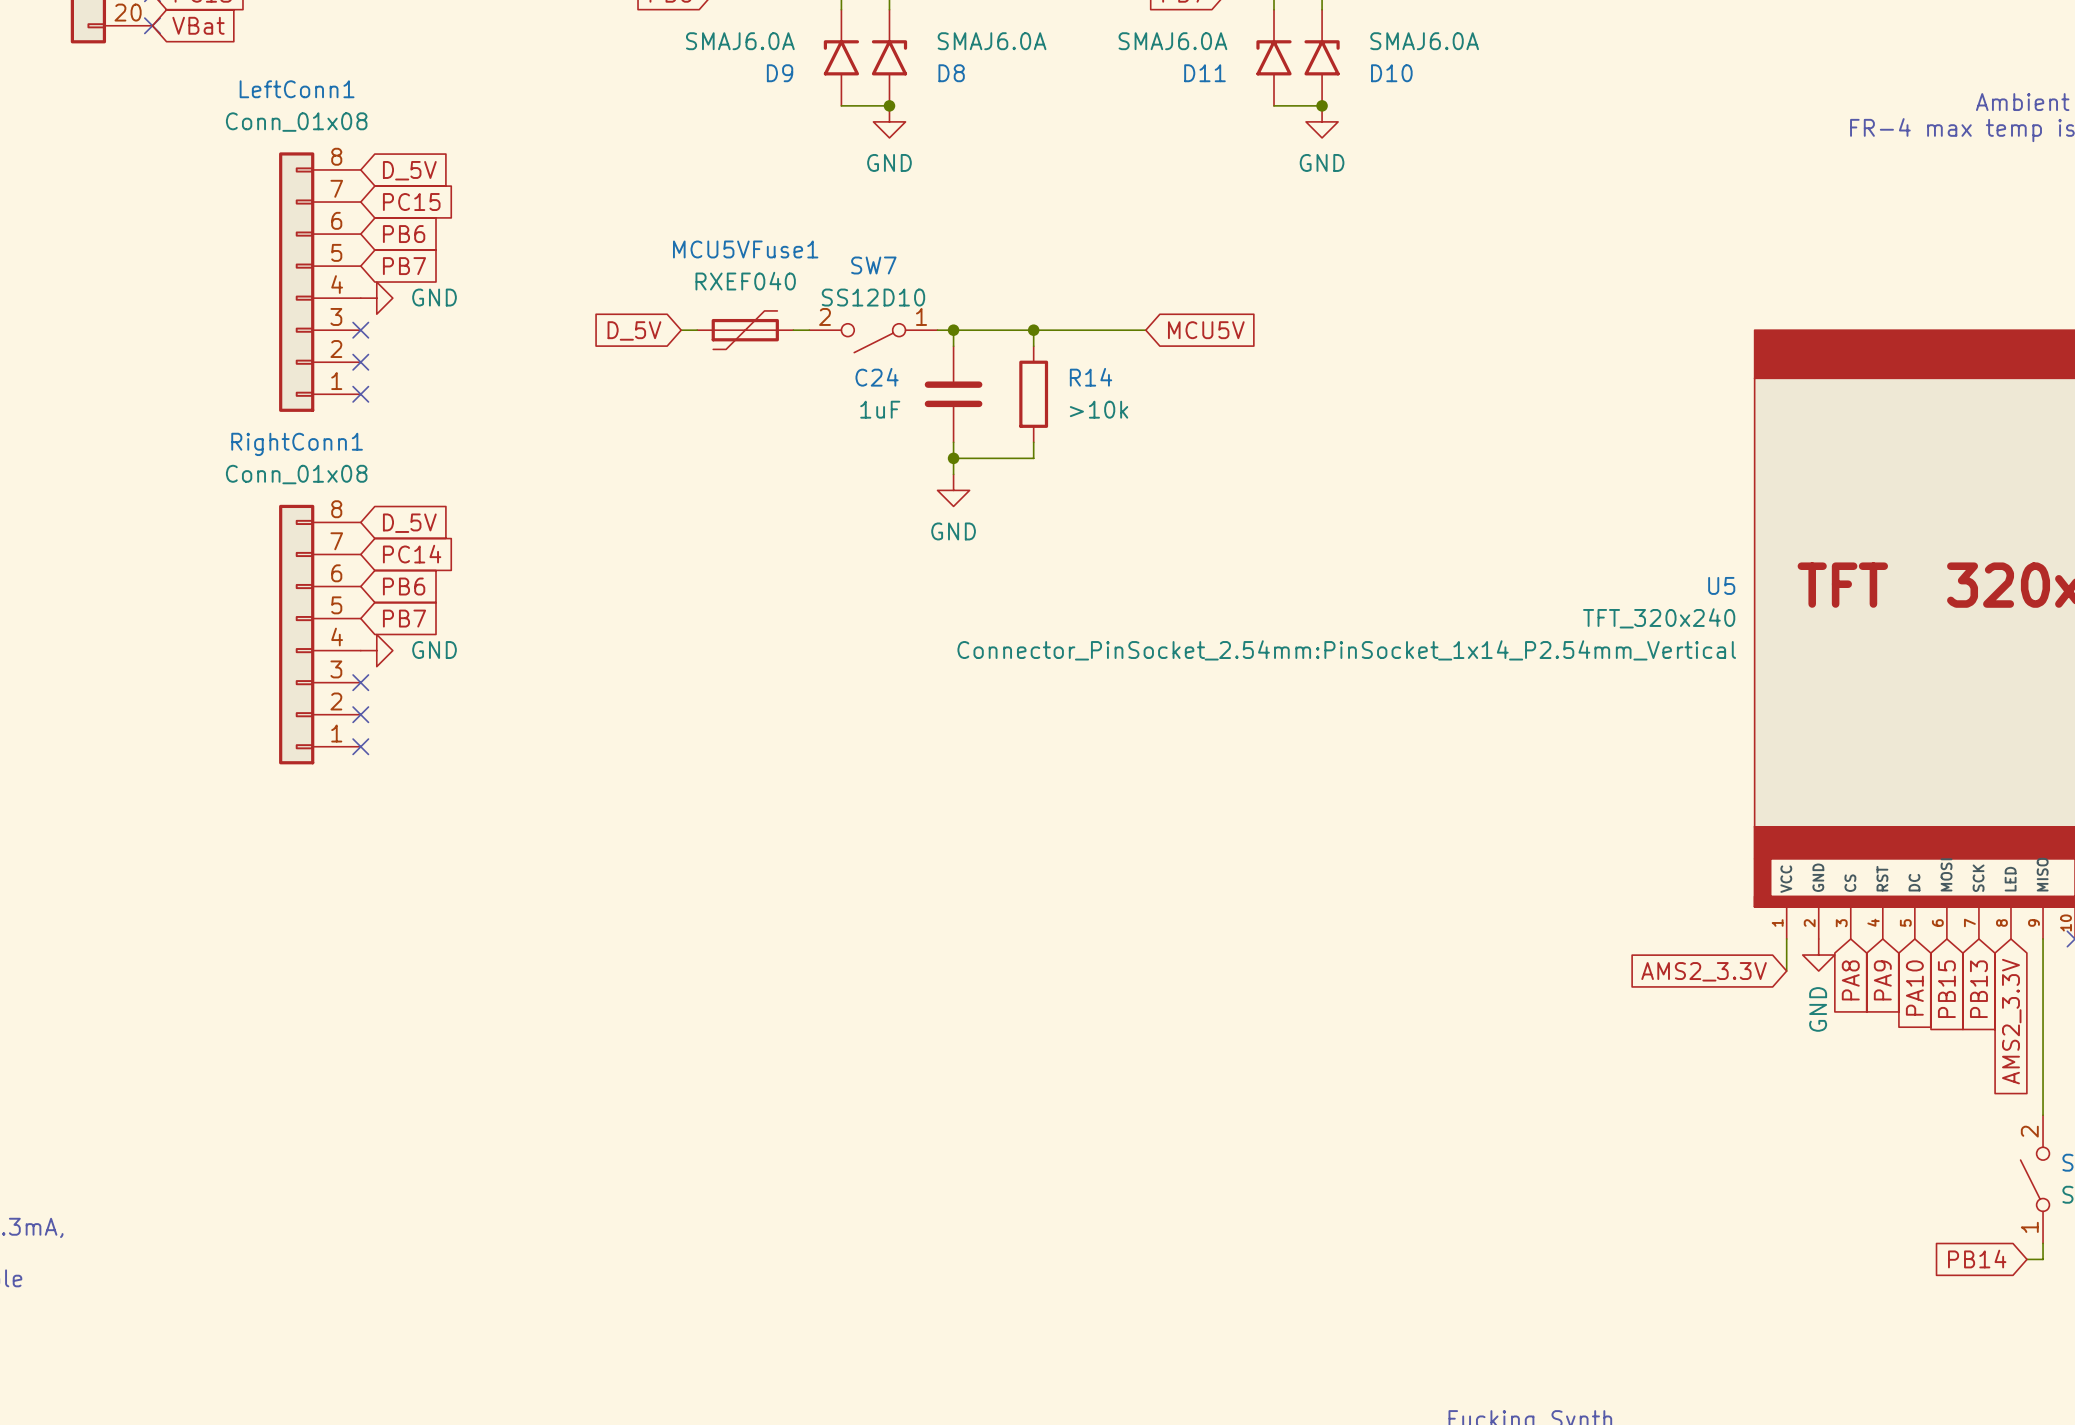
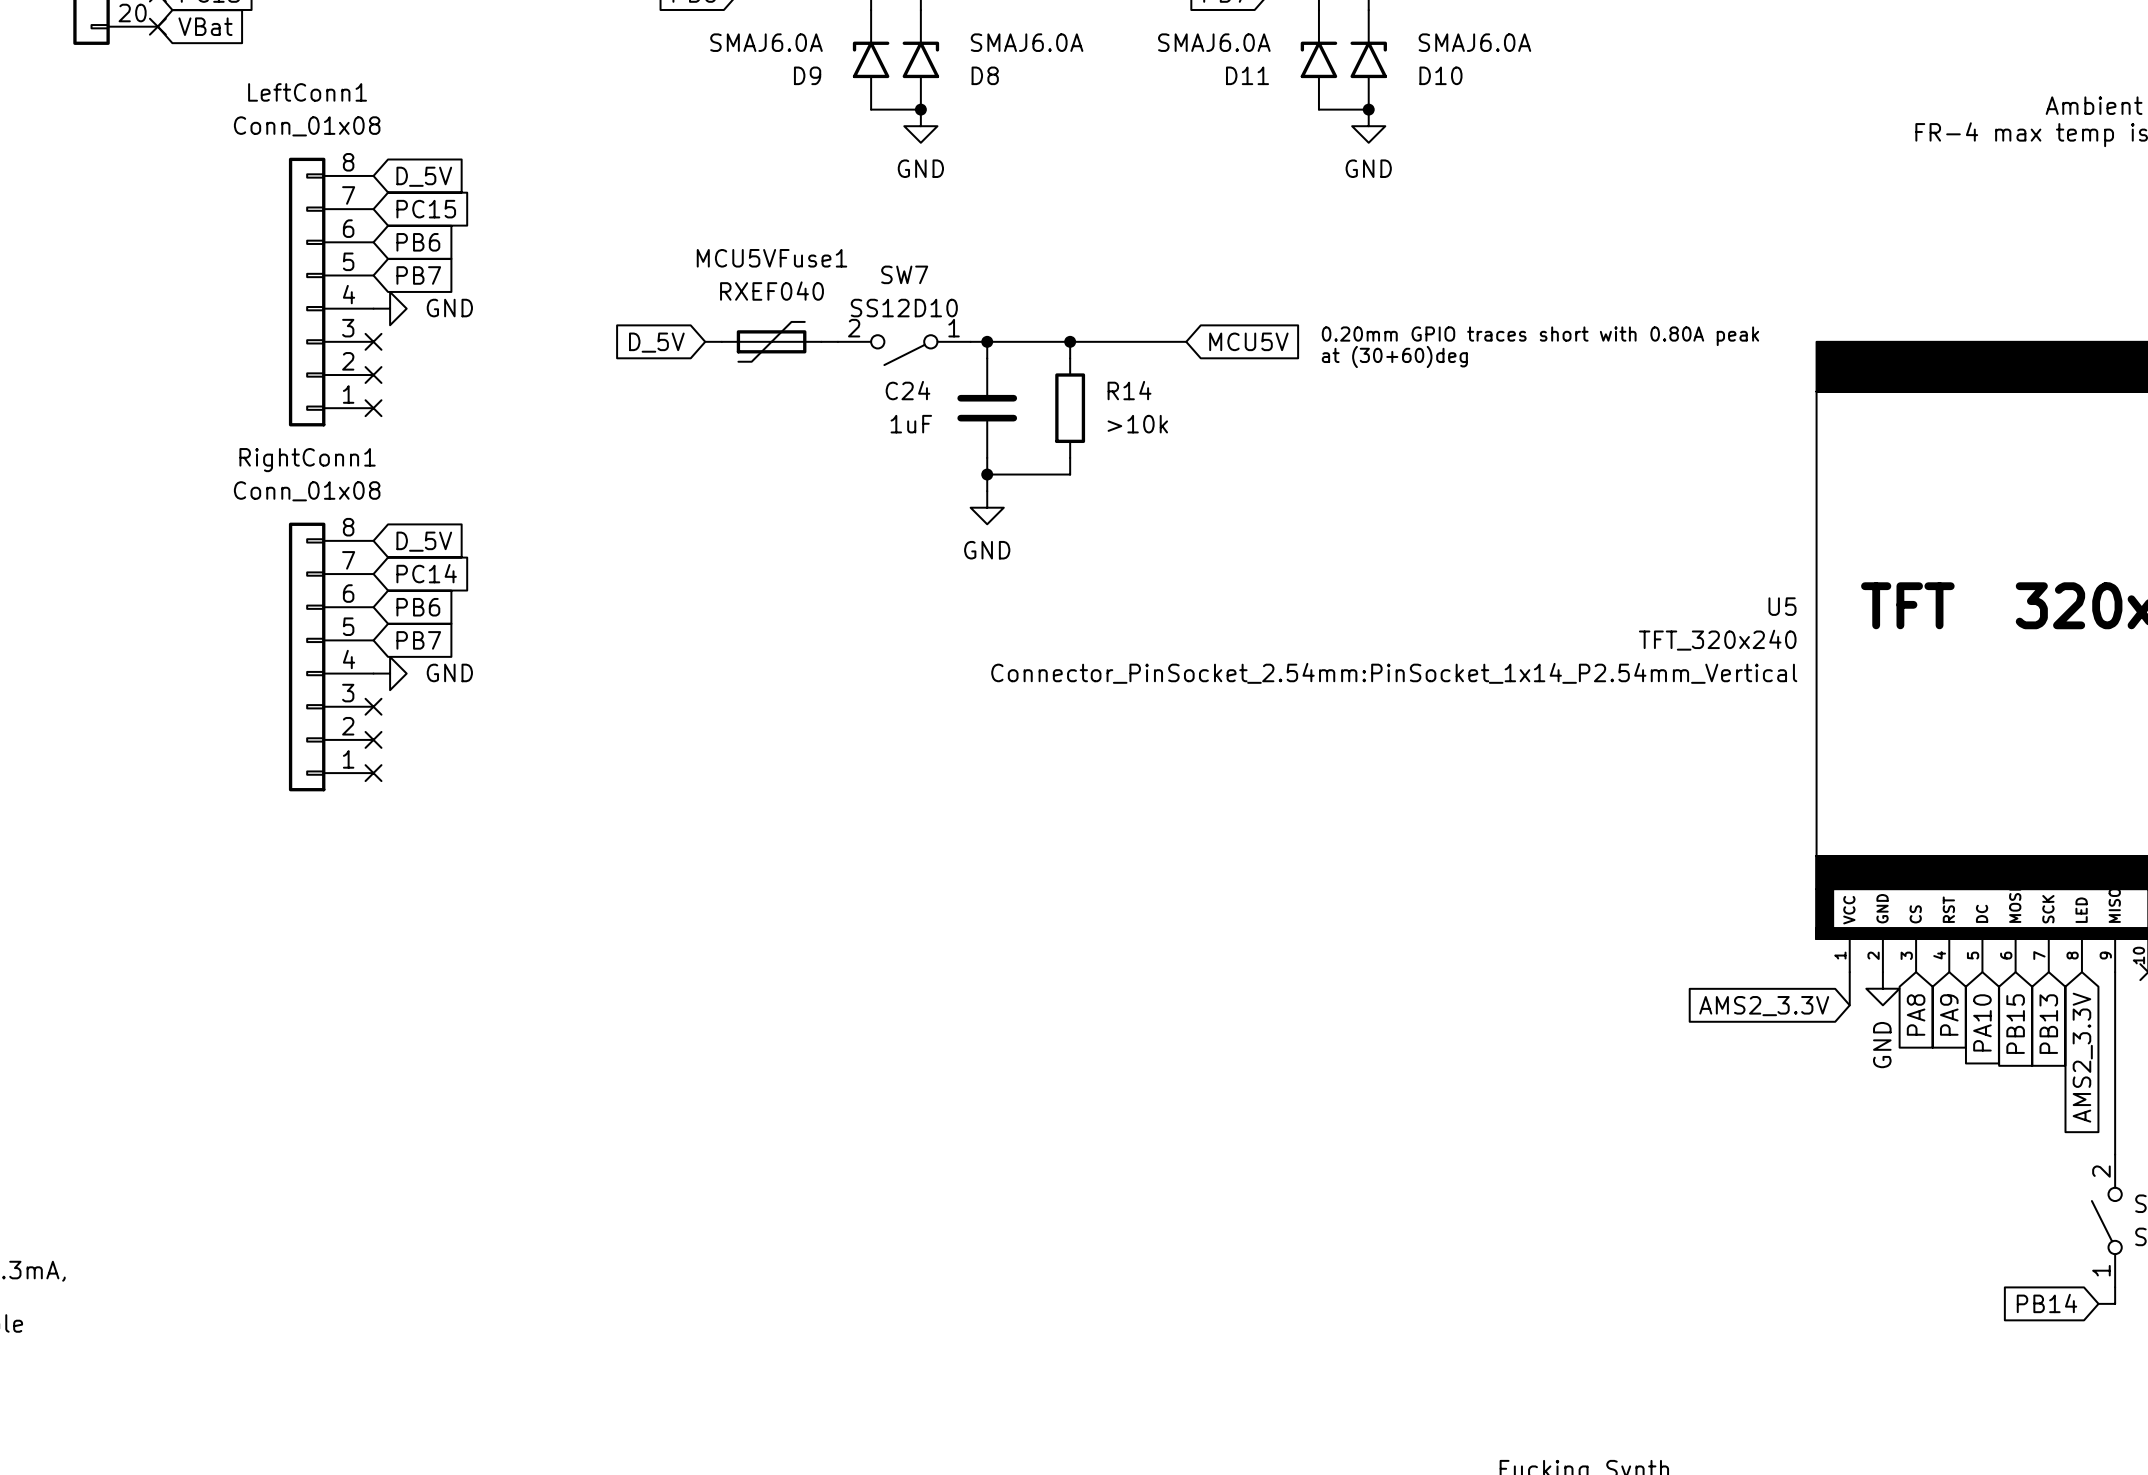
text: none -> 0.20mm GPIO traces short with 0.80A peak (1540, 336)
text: none -> at (30+60)deg (1394, 356)

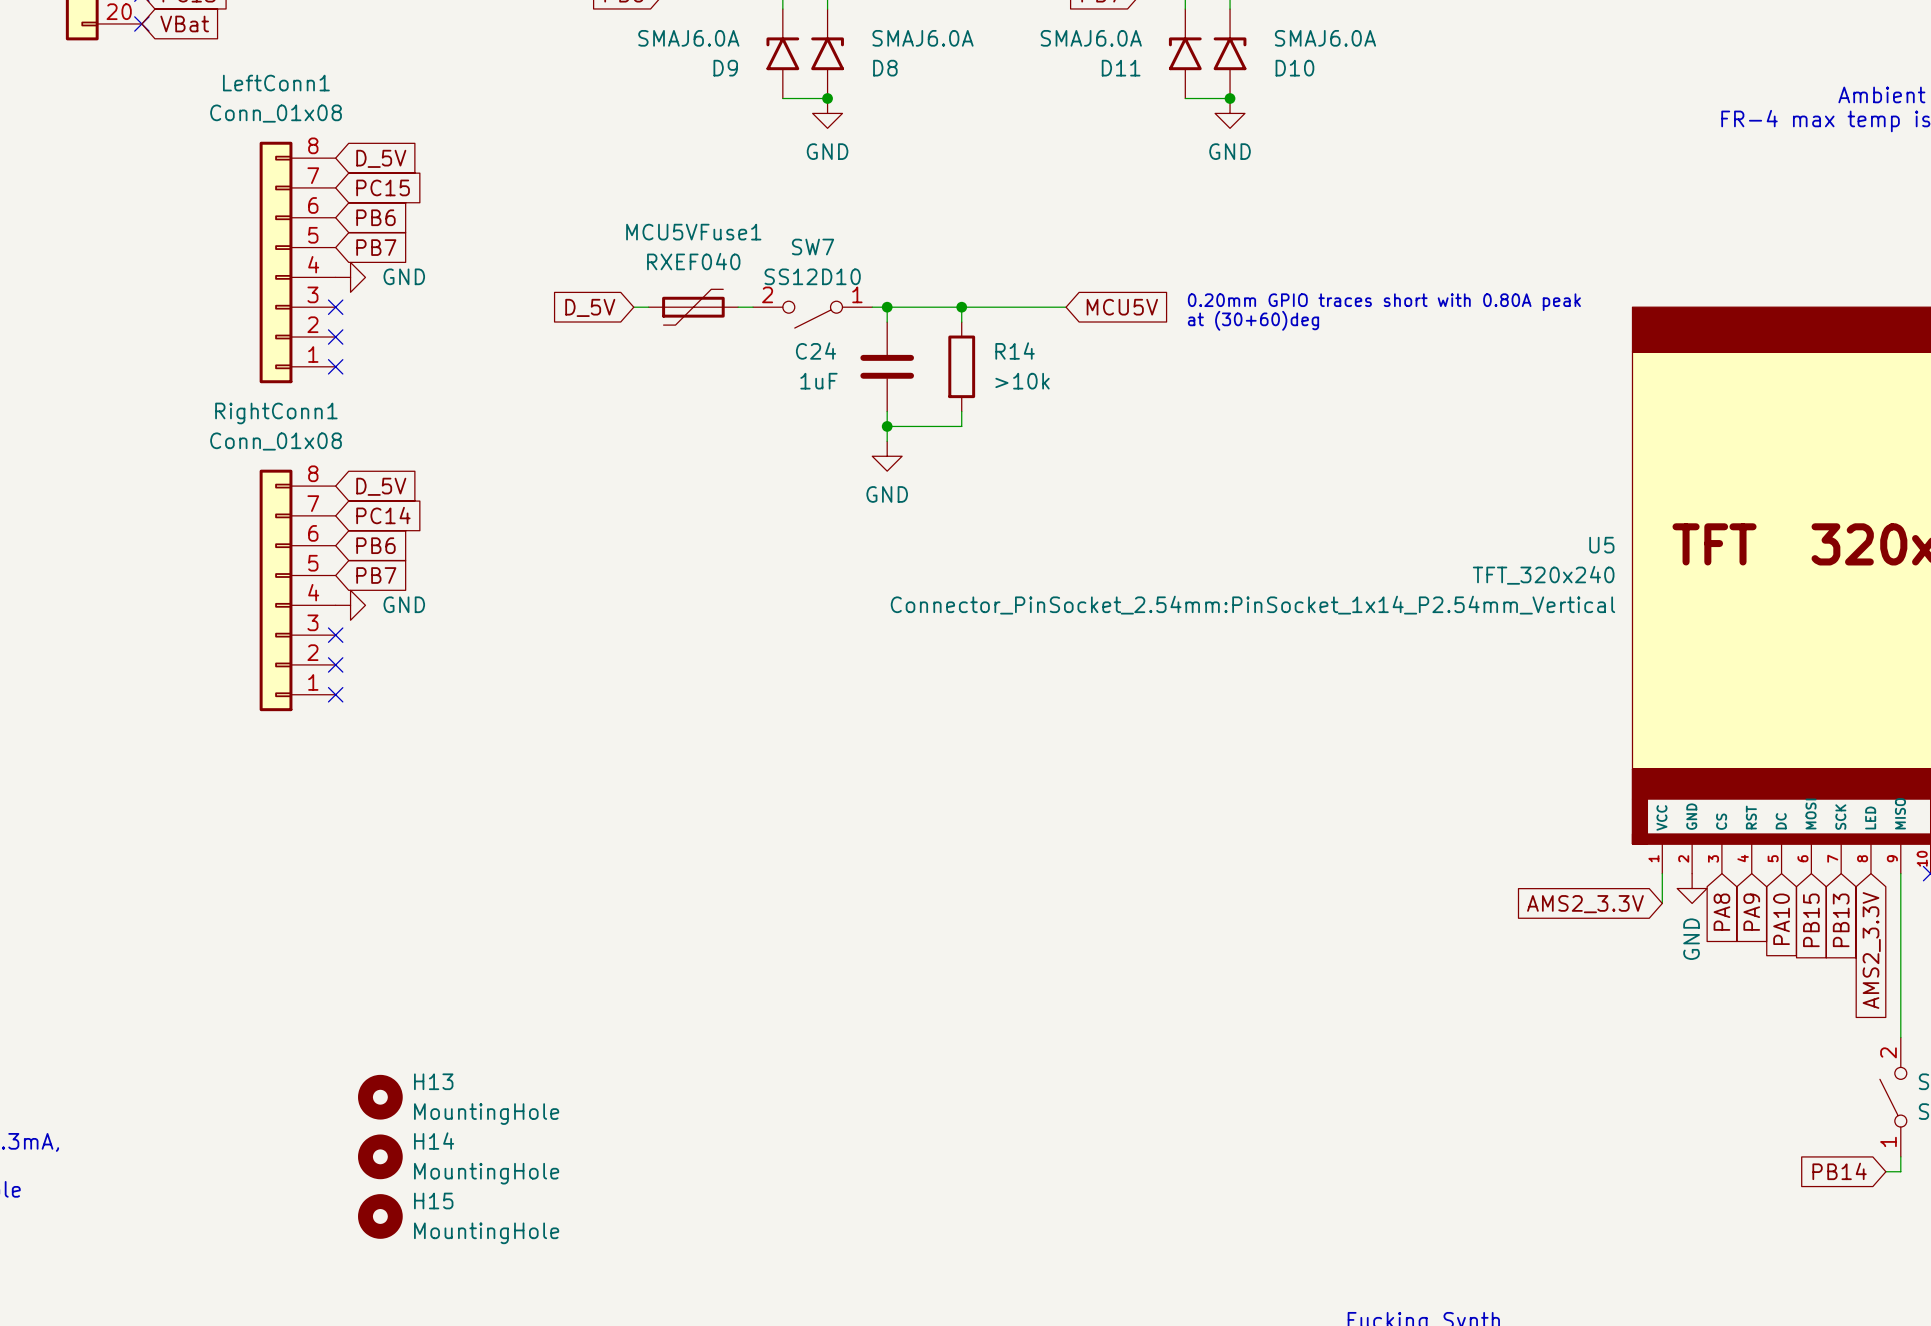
H13: none -> MountingHole (380, 1097)
H14: none -> MountingHole (380, 1156)
H15: none -> MountingHole (380, 1216)

